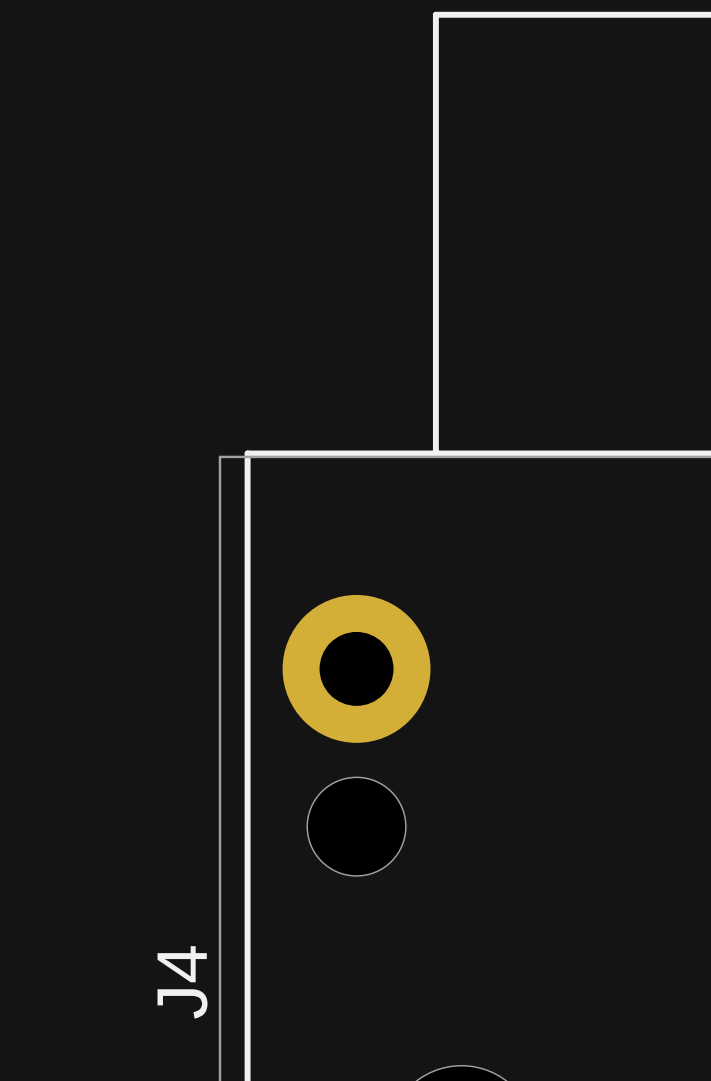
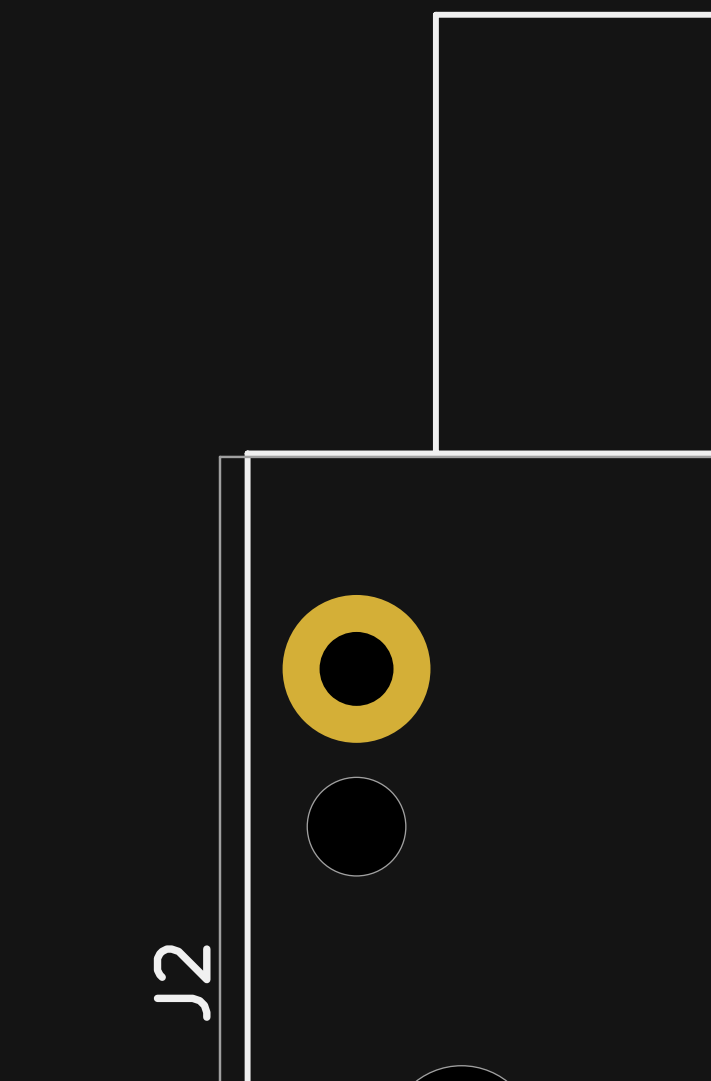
J4 name: J4 (182, 982) -> J2 (182, 983)

